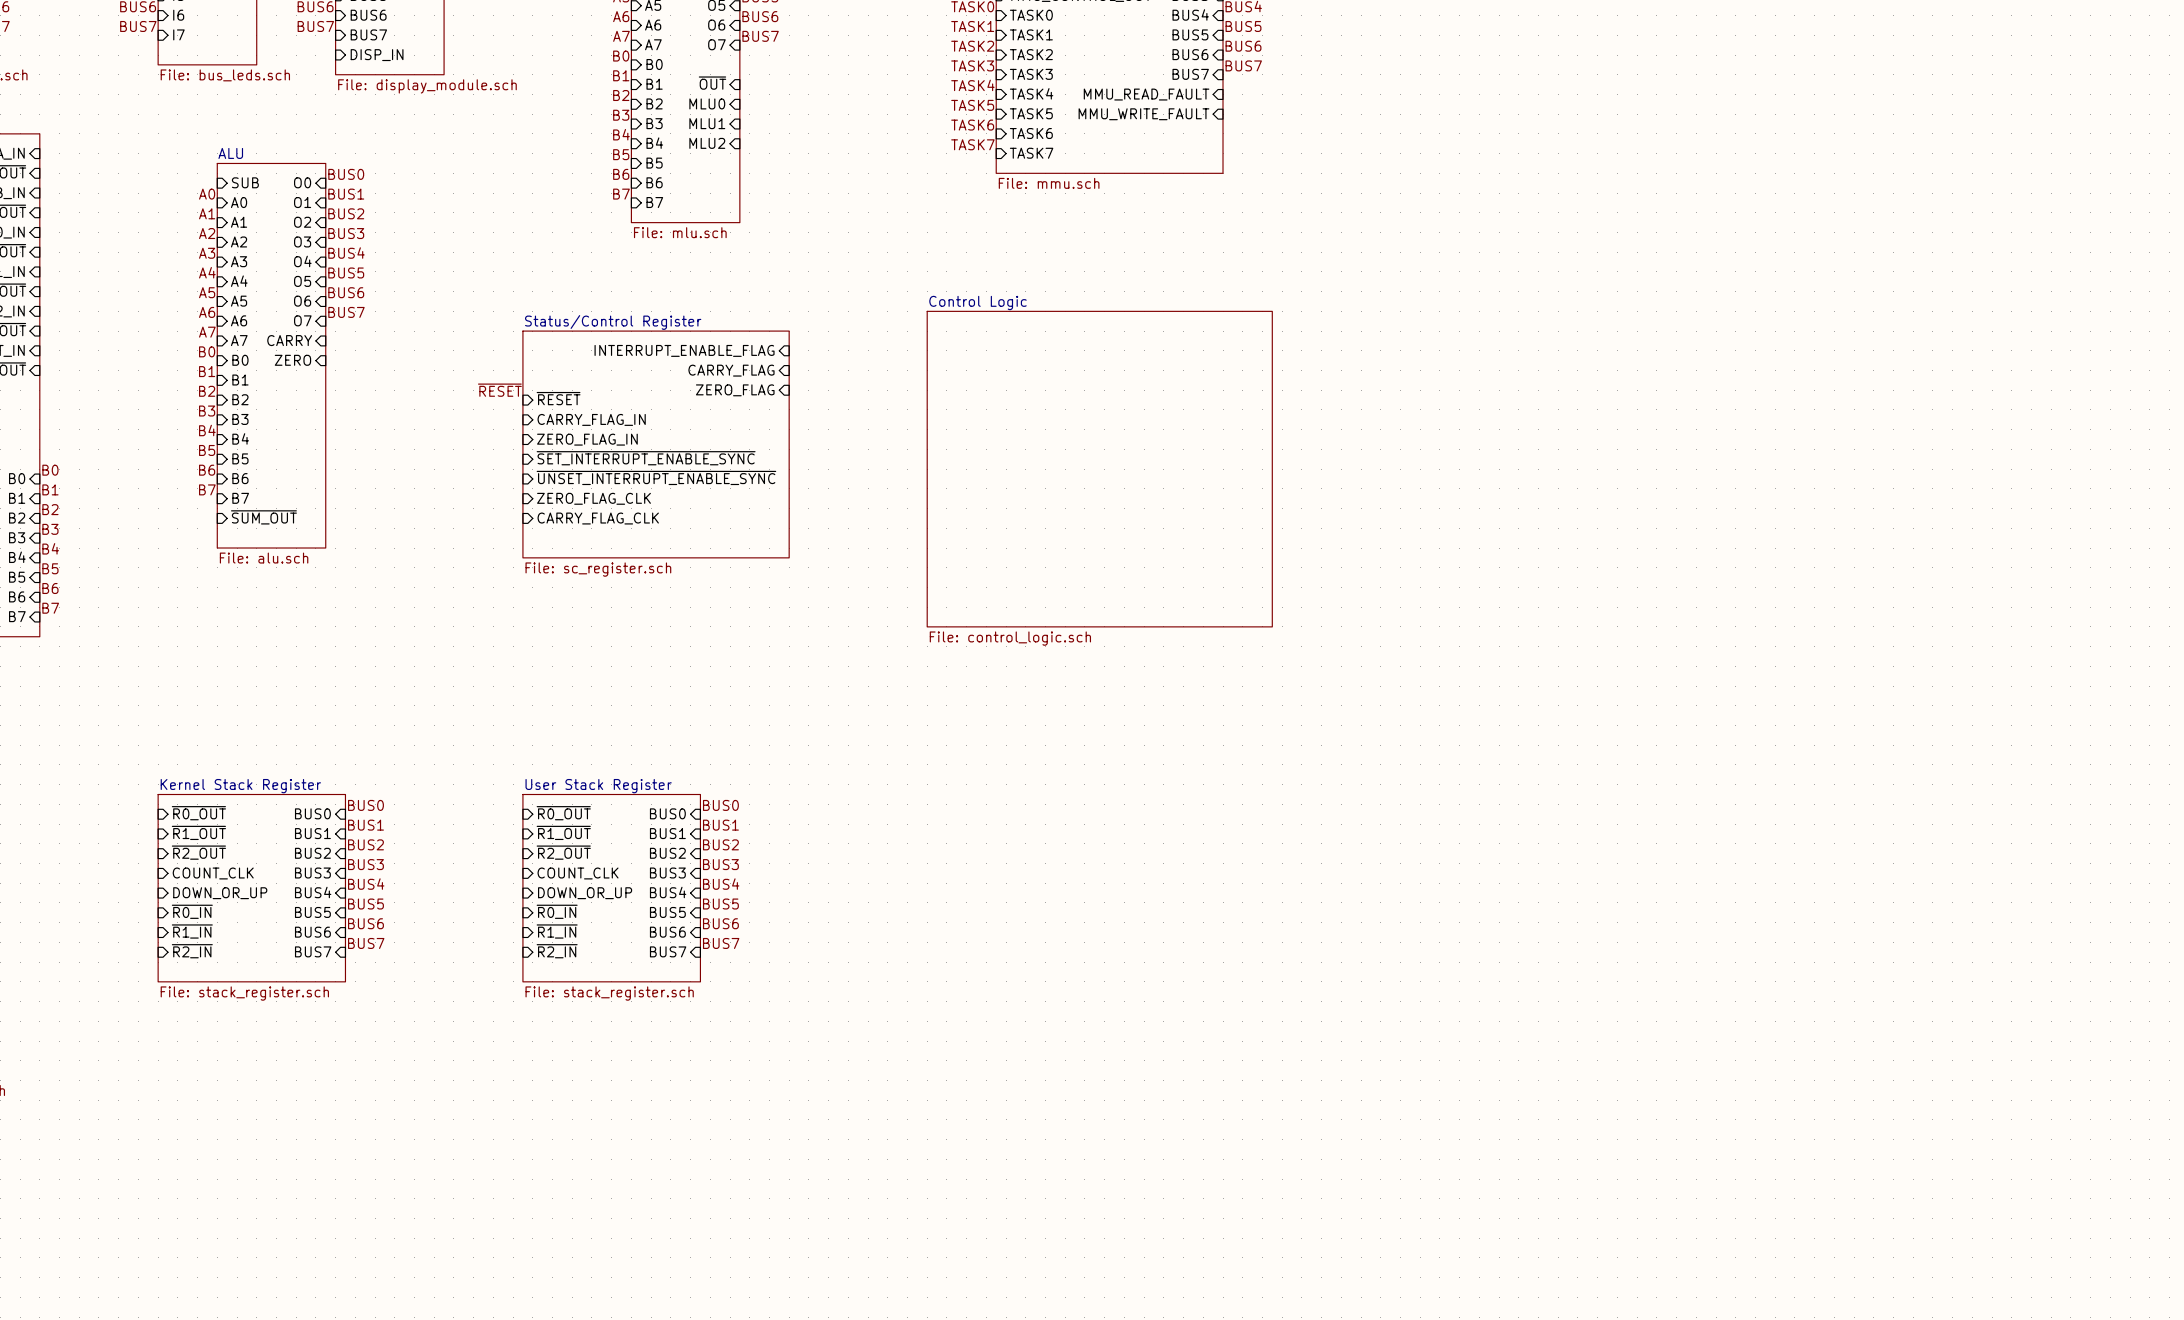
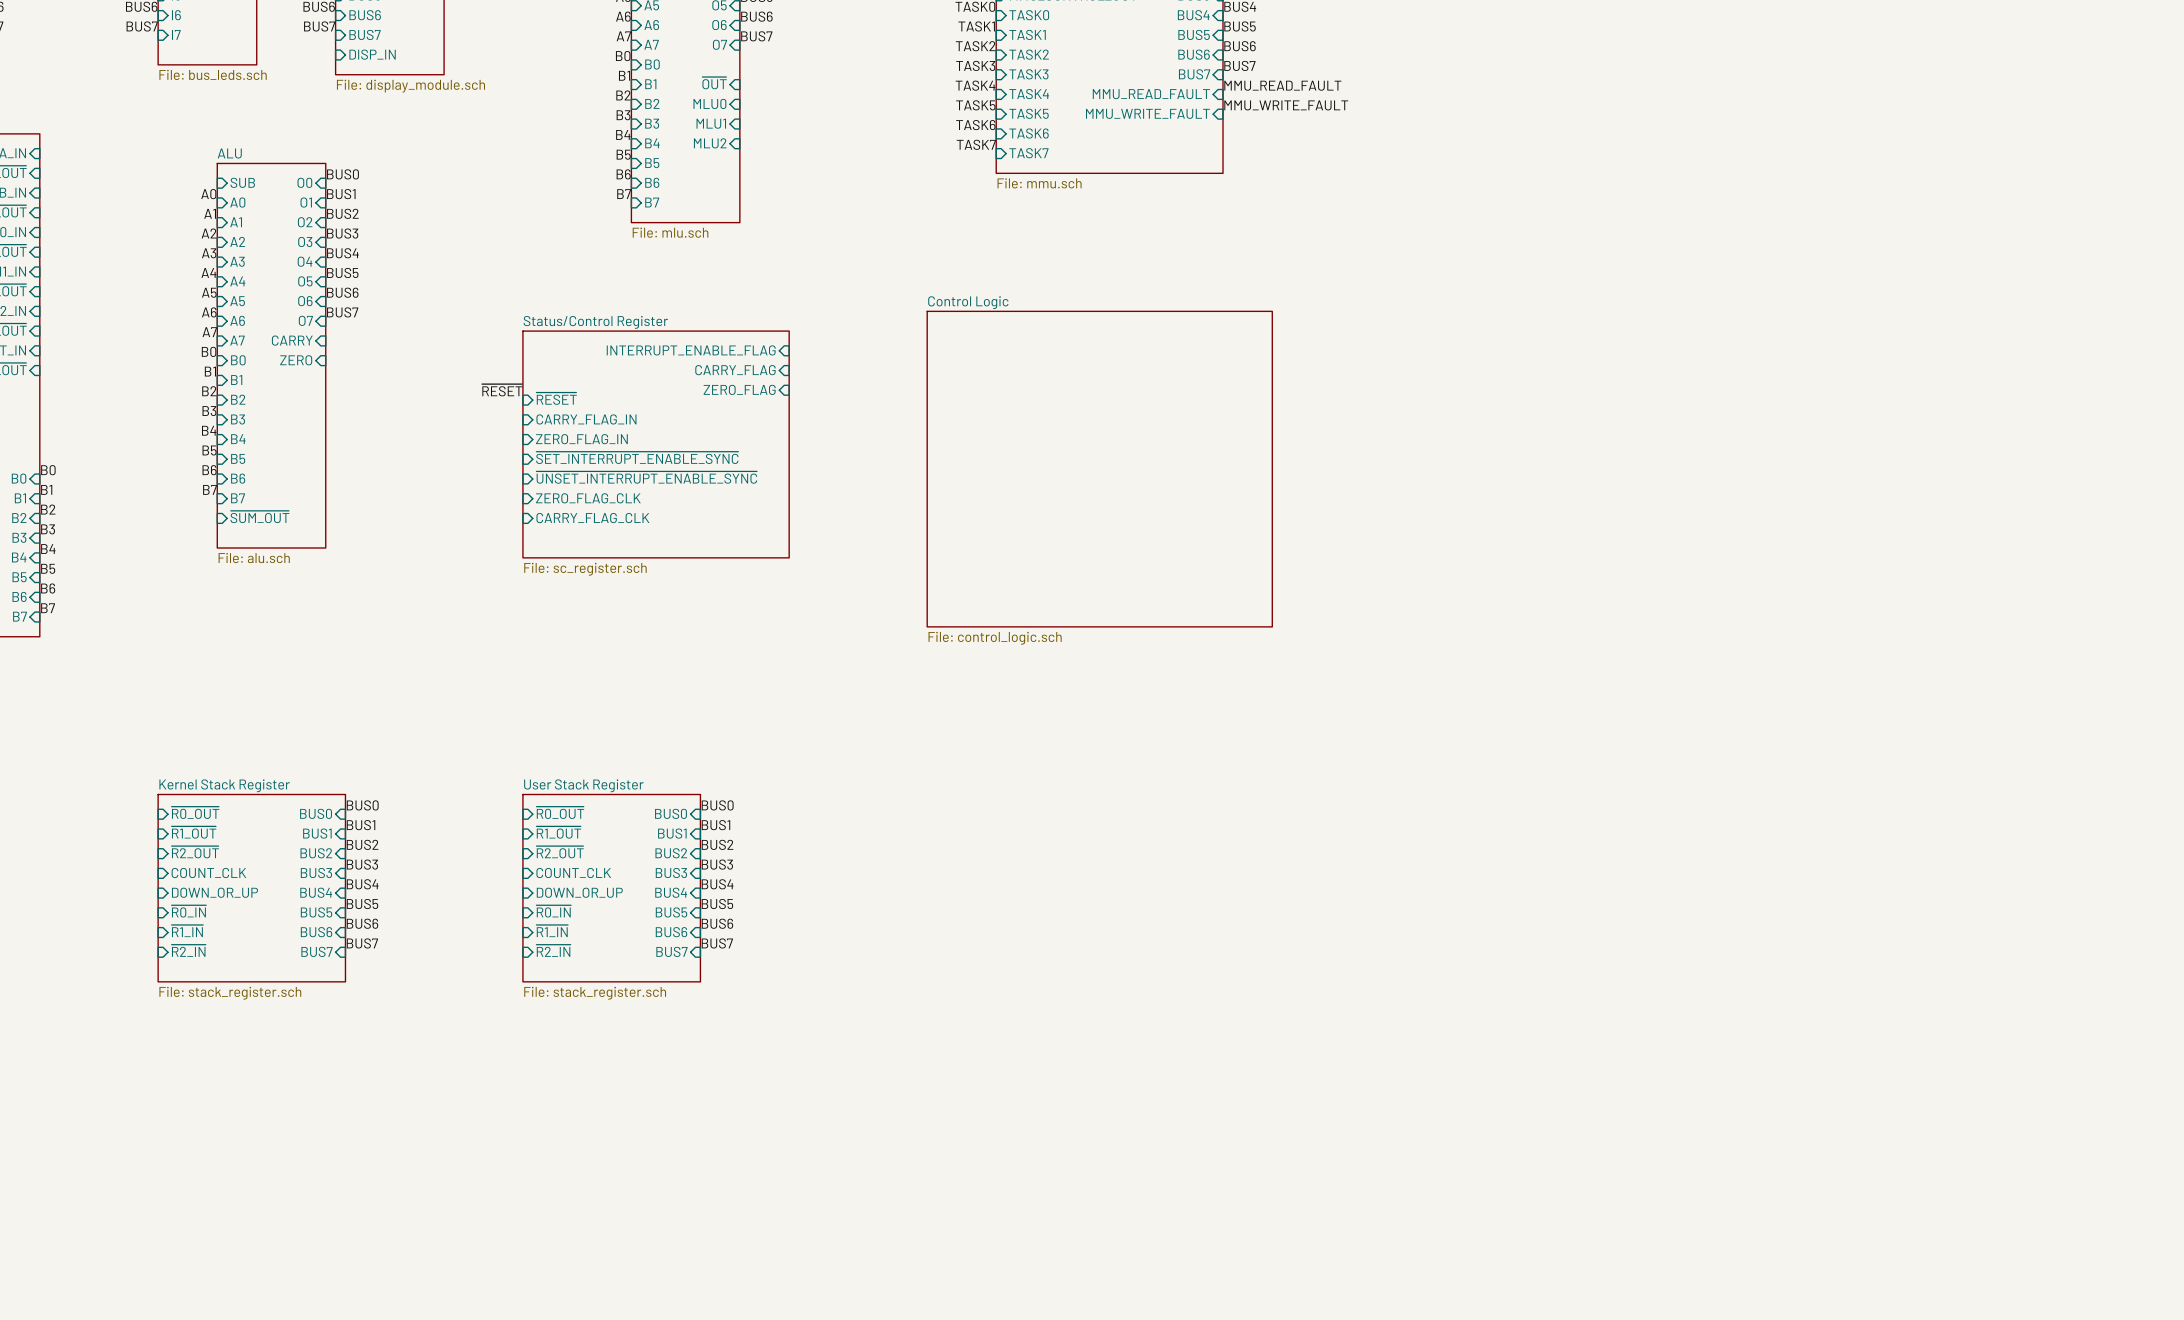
label: none -> MMU_READ_FAULT (1282, 85)
label: none -> MMU_WRITE_FAULT (1286, 105)

